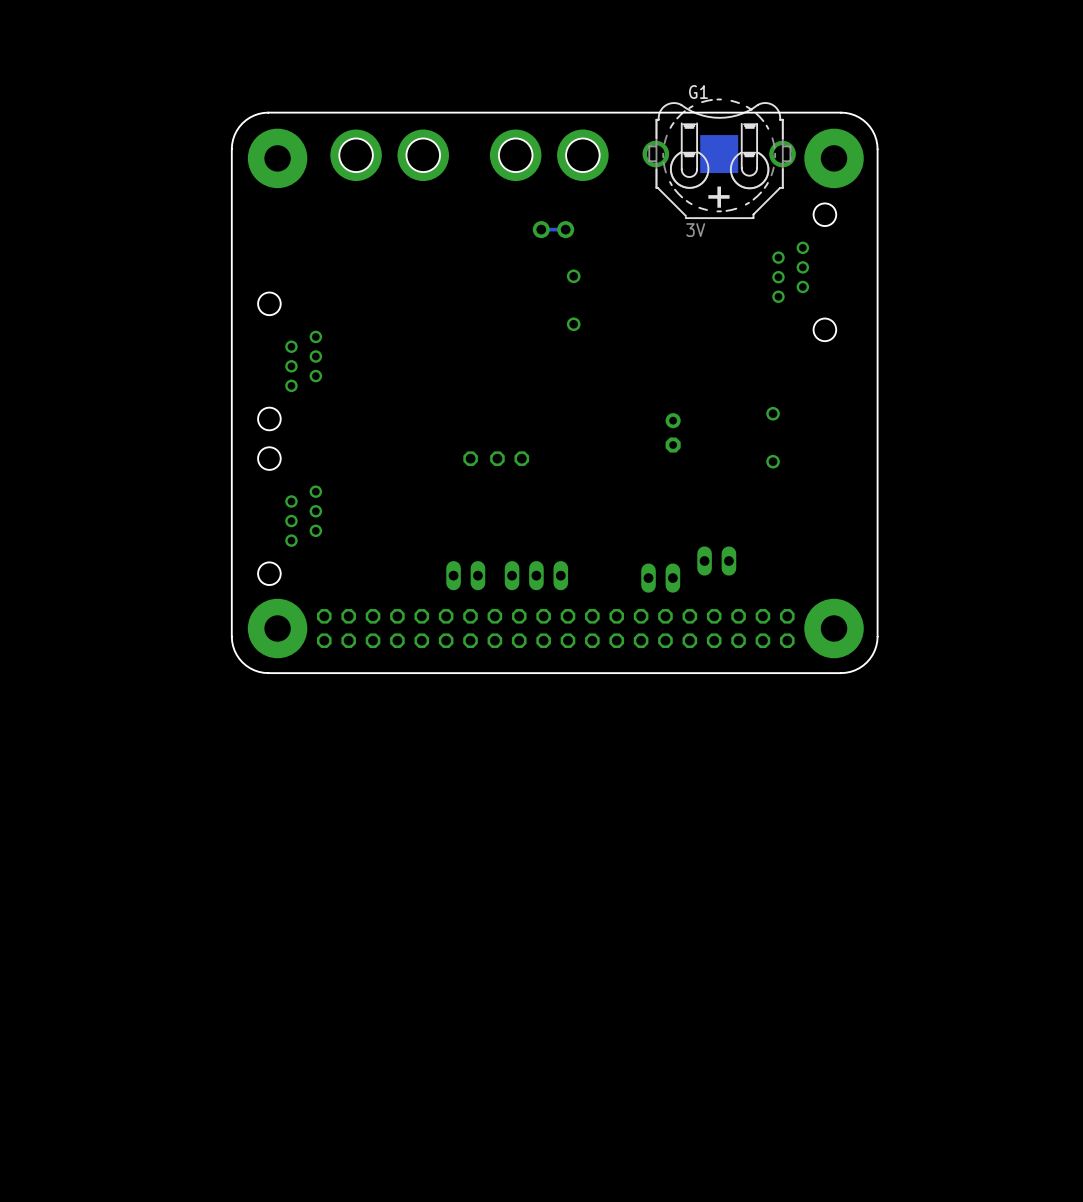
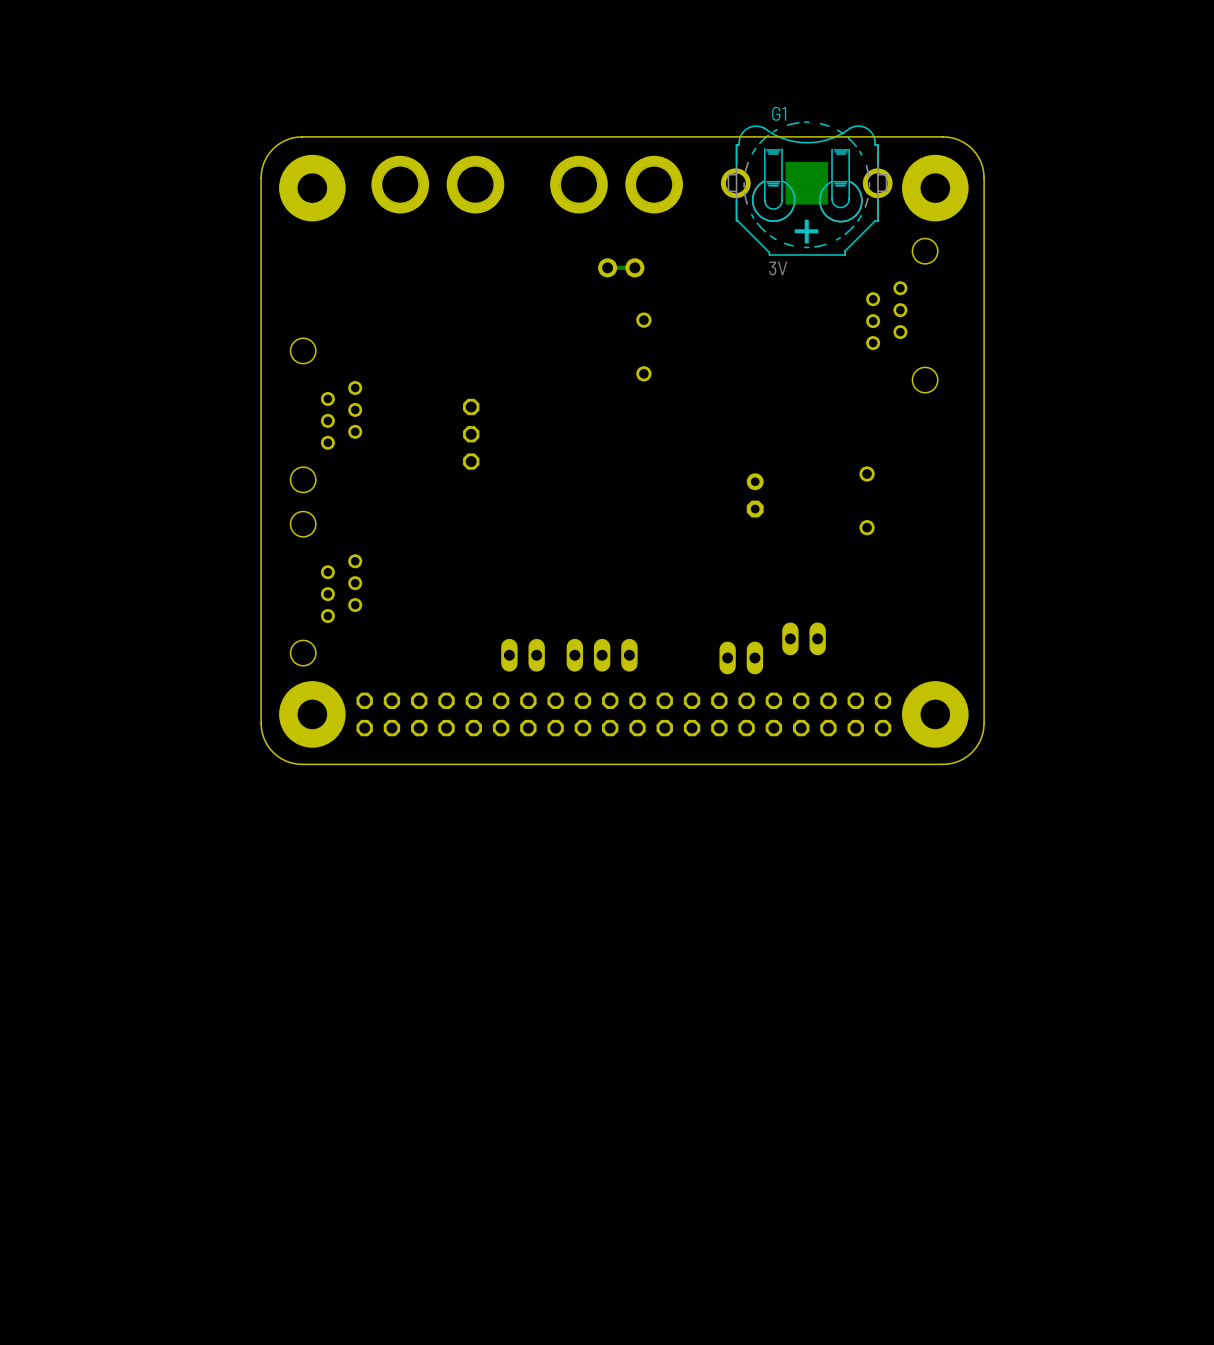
part: none -> (471, 406)
part: none -> (471, 434)
part: none -> (471, 461)
part: (470, 458) -> none
part: (497, 458) -> none
part: (521, 458) -> none

